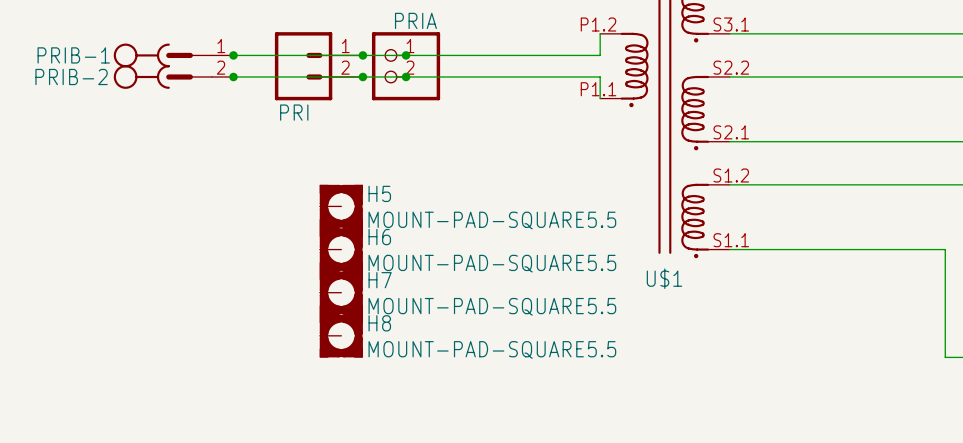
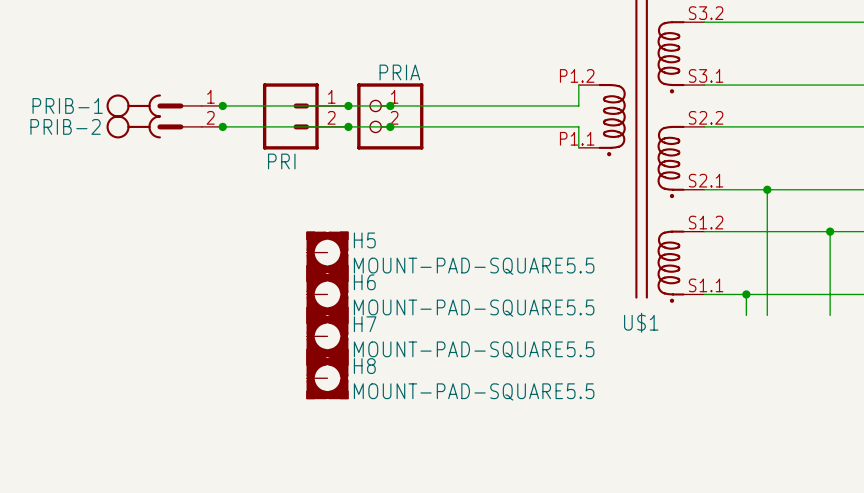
wire: none -> (767, 189) (767, 315)
junction: none -> (767, 189)
wire: none -> (830, 231) (830, 315)
junction: none -> (830, 231)
wire: none -> (746, 294) (746, 315)
junction: none -> (746, 294)

